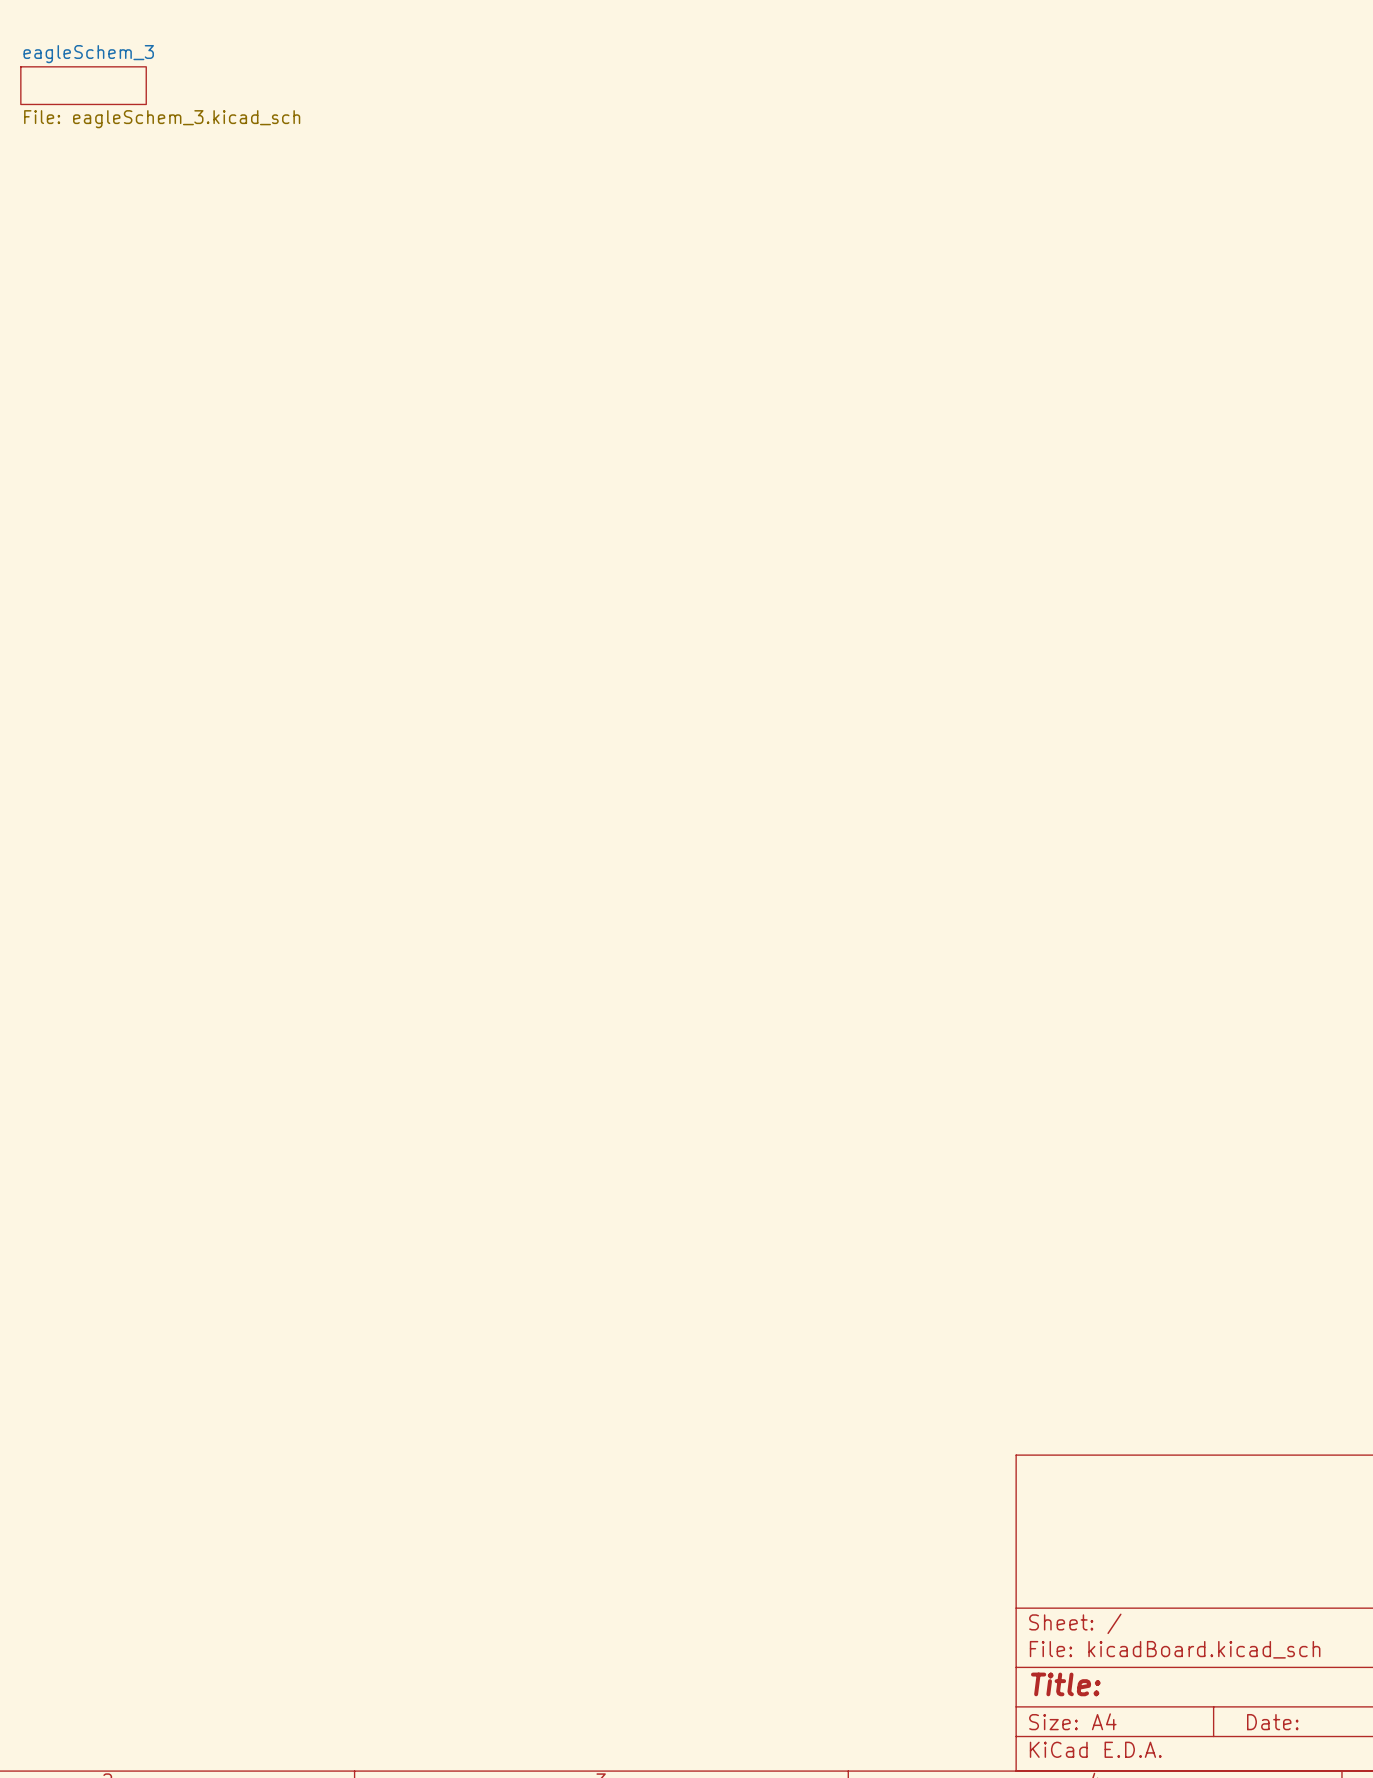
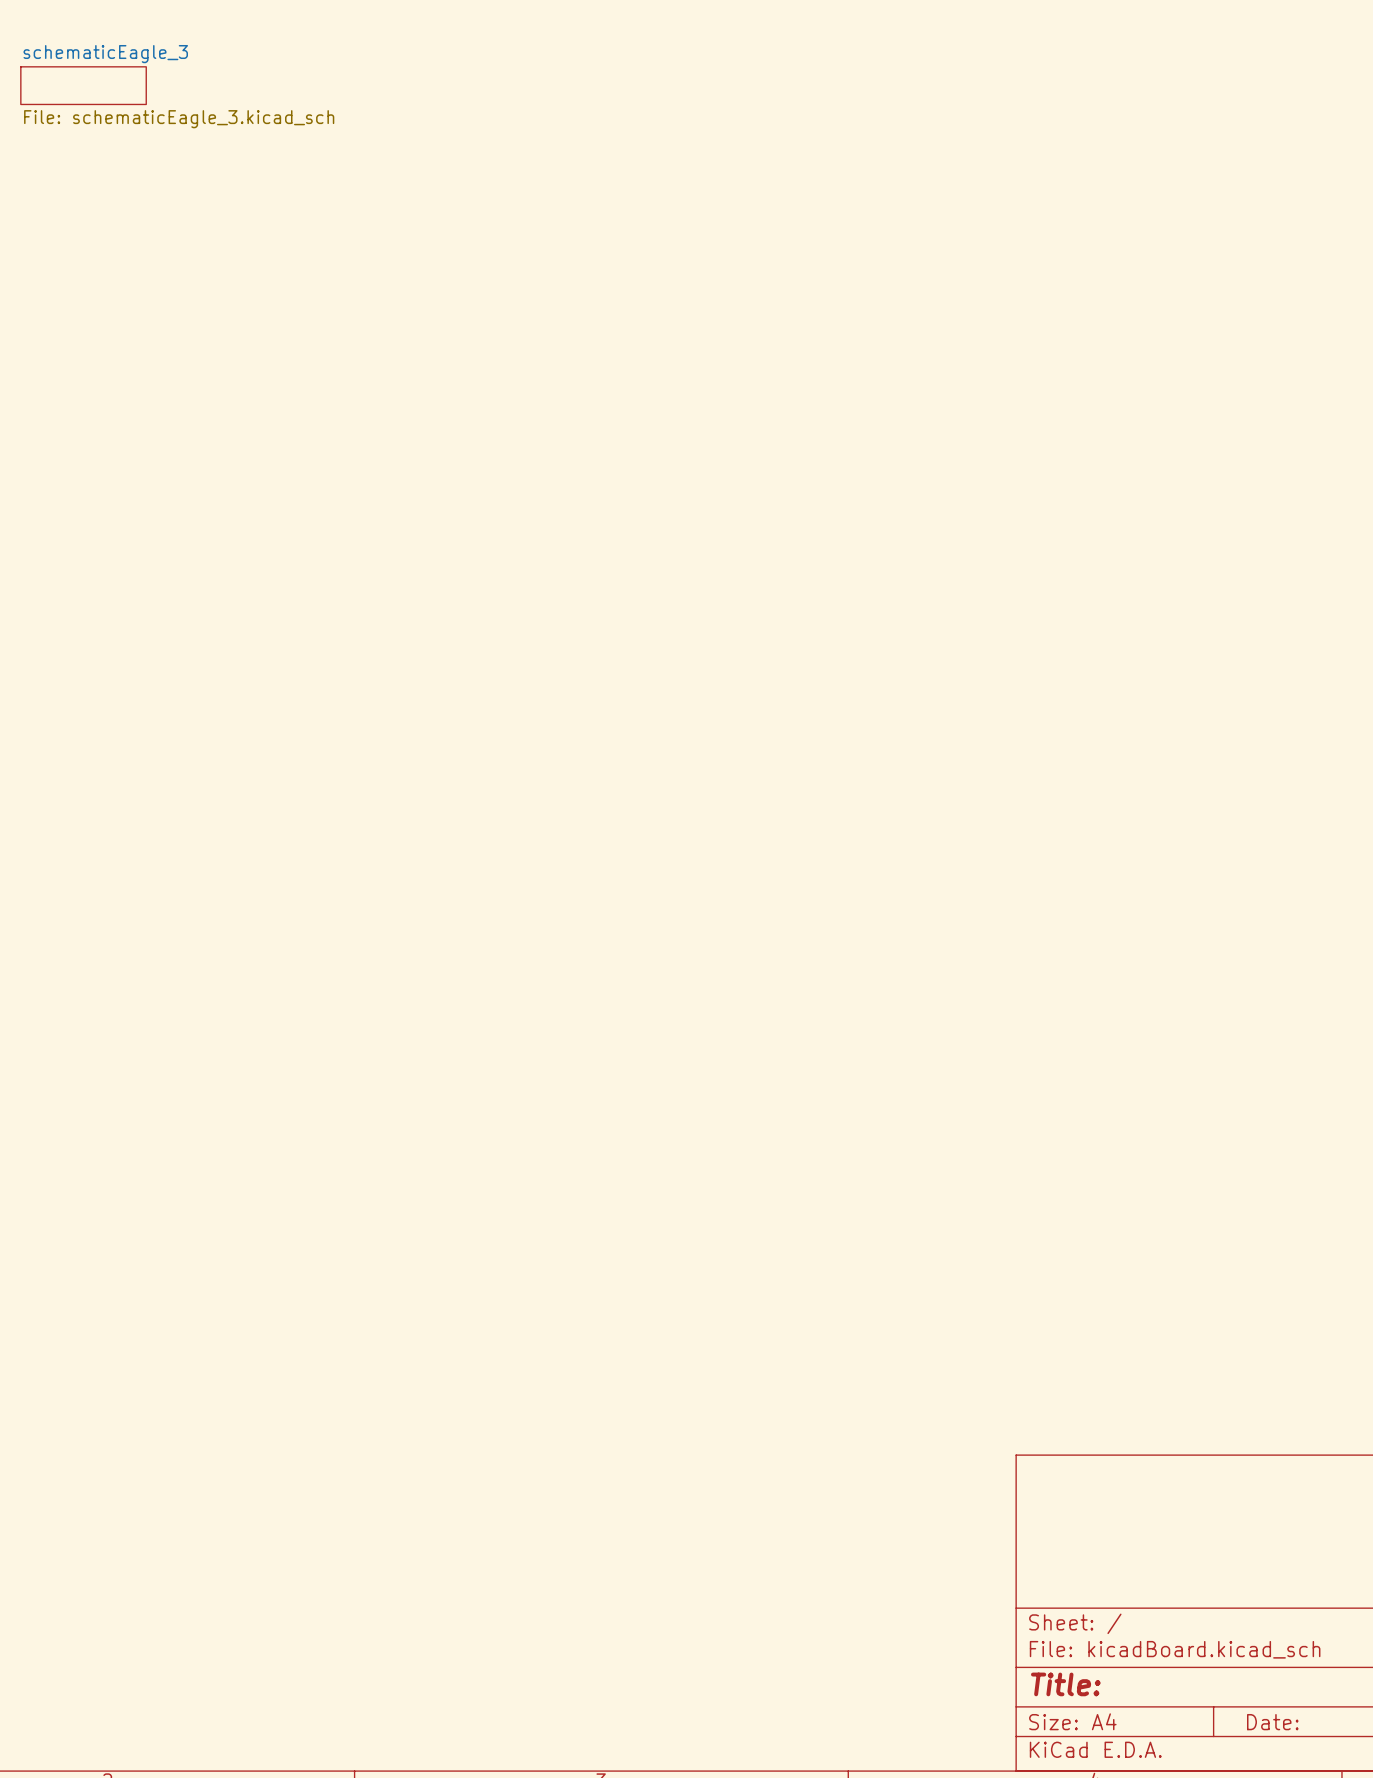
sheet eagleSchem_3 name: eagleSchem_3 (88, 54) -> schematicEagle_3 (105, 54)
sheet eagleSchem_3 value: File: eagleSchem_3.kicad_sch (162, 119) -> File: schematicEagle_3.kicad_sch (179, 119)

